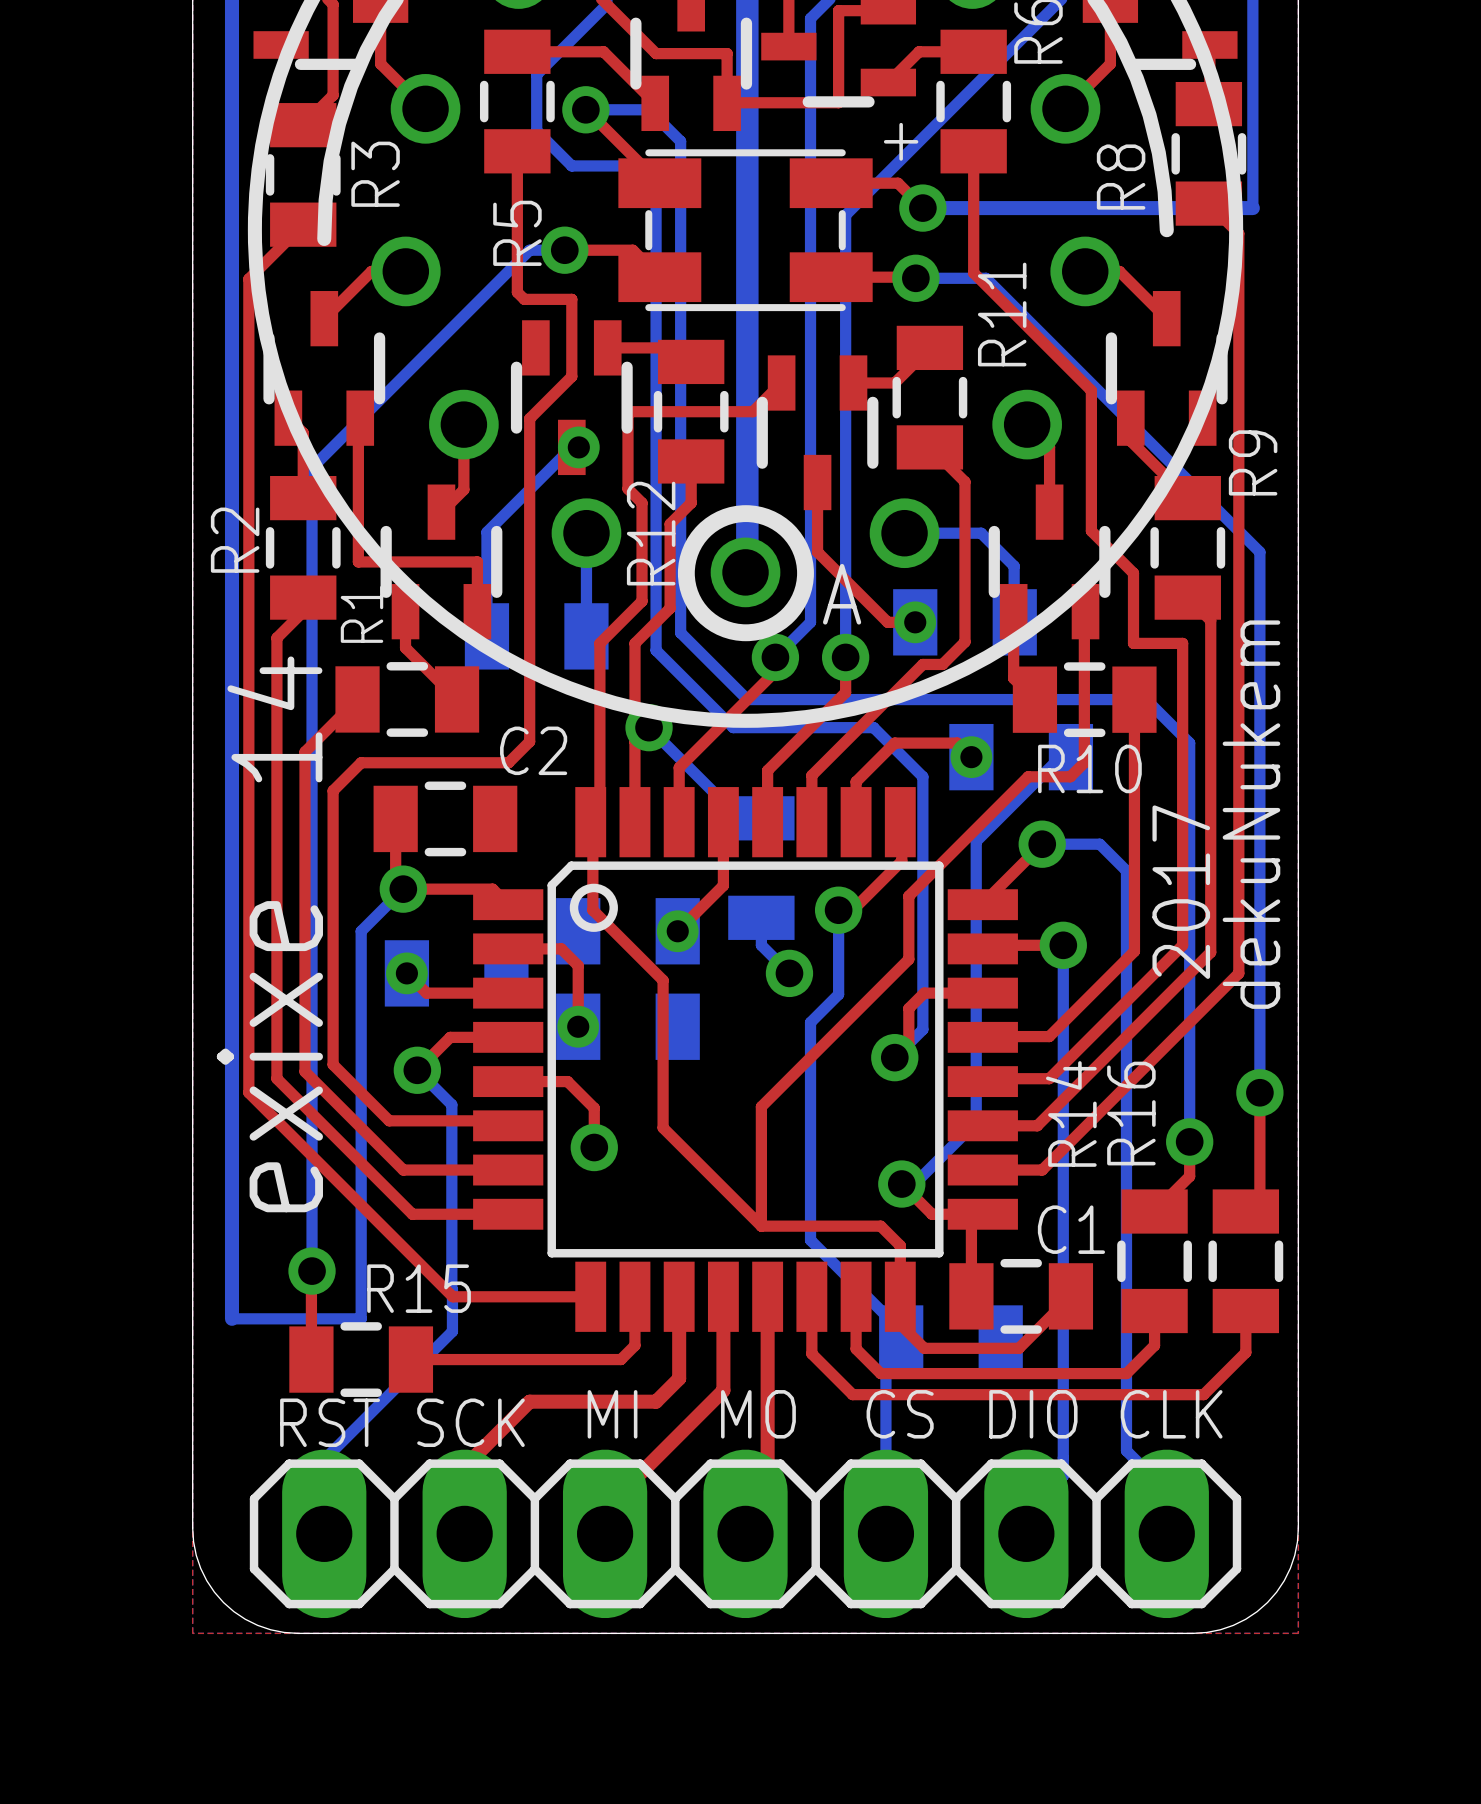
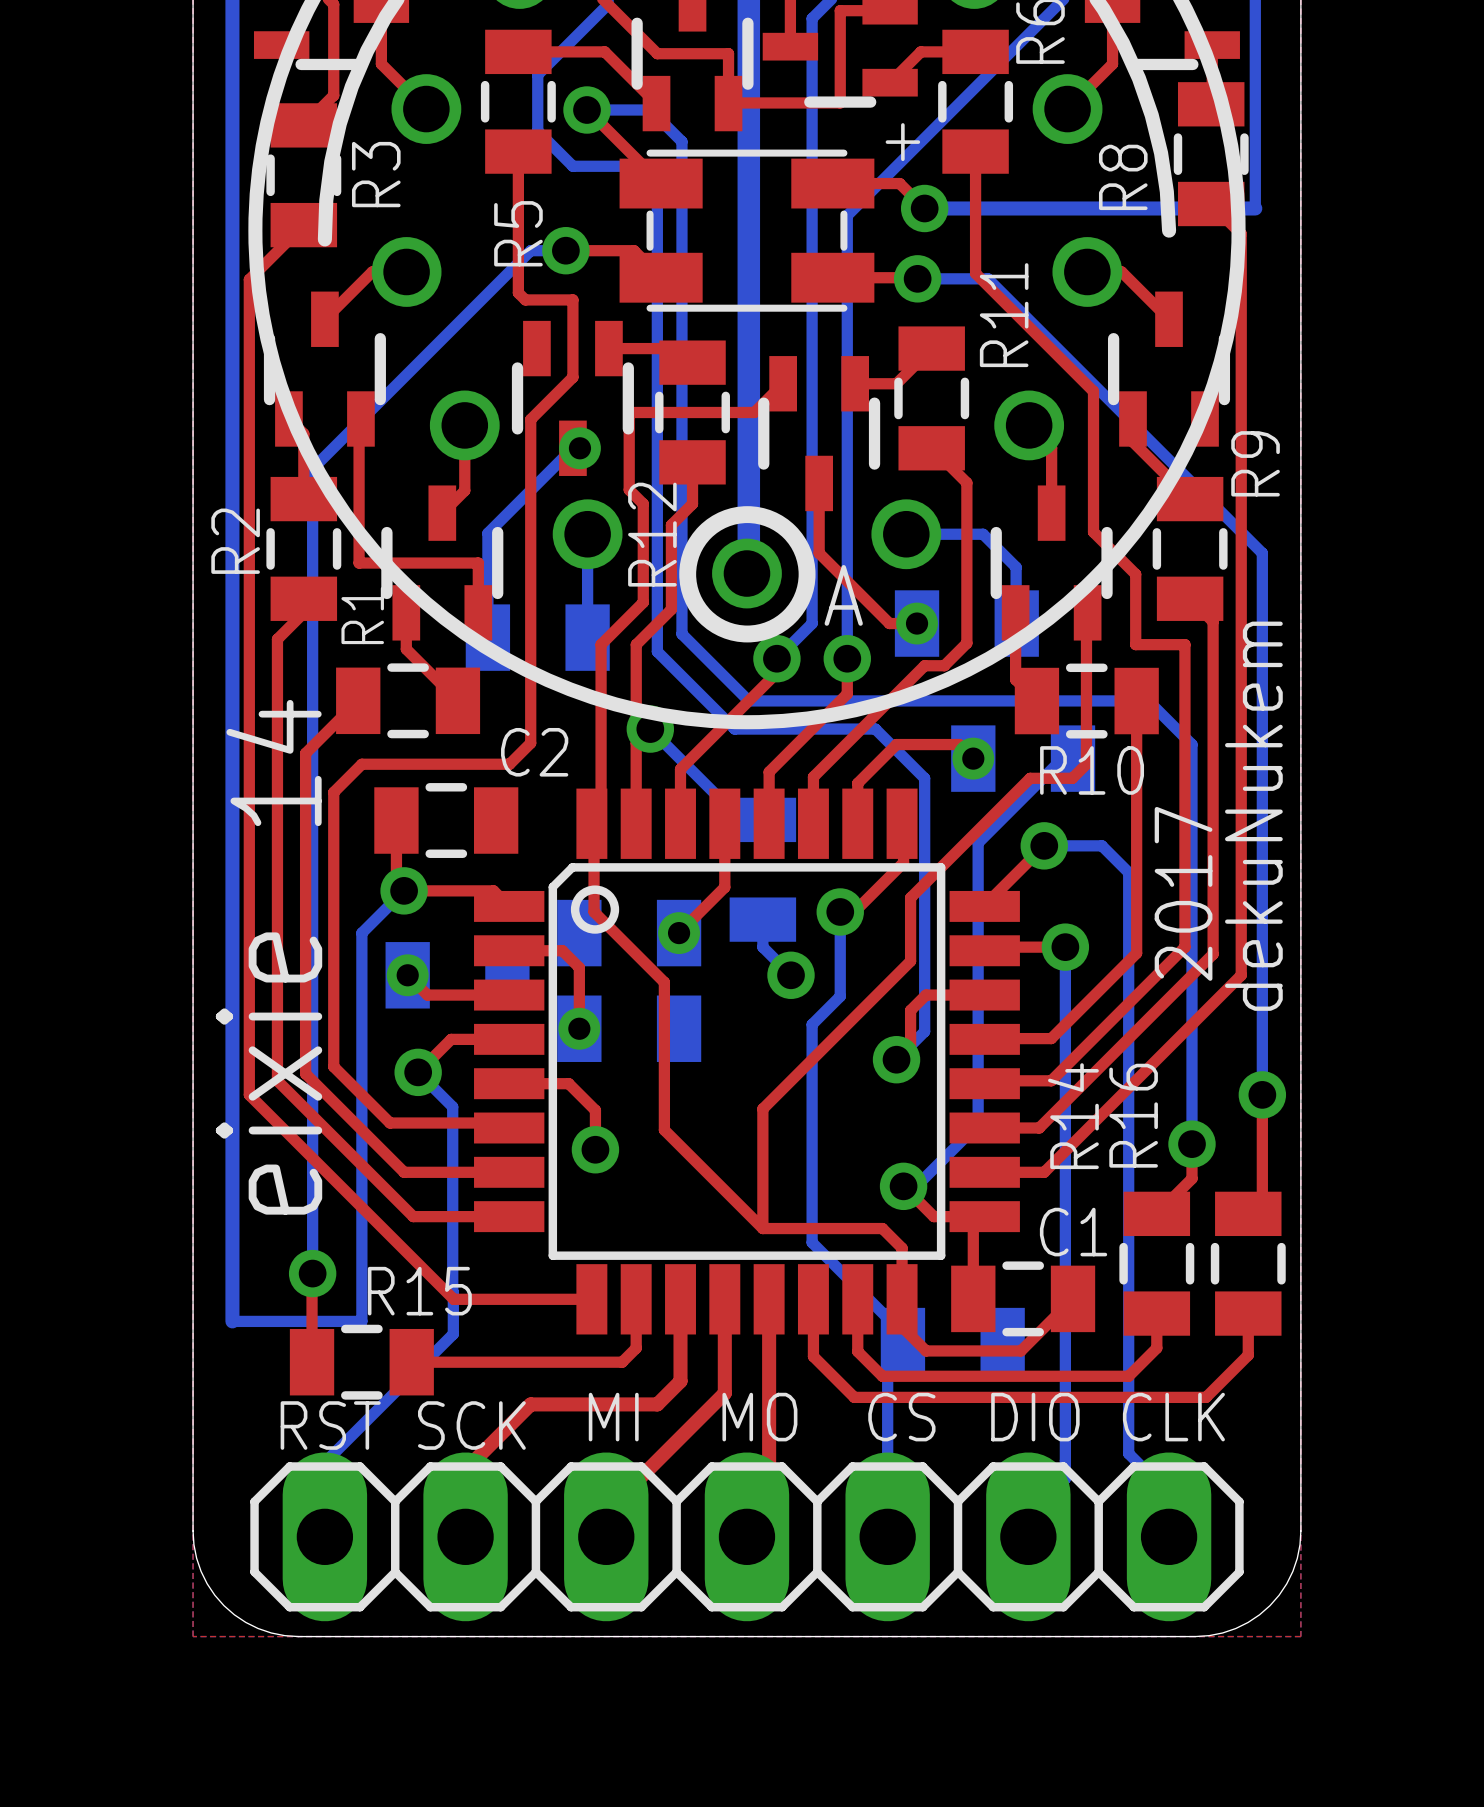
text position: 14 (274, 719) -> 14 (274, 763)
text: exixe (269, 1056) -> eixie (269, 1073)

